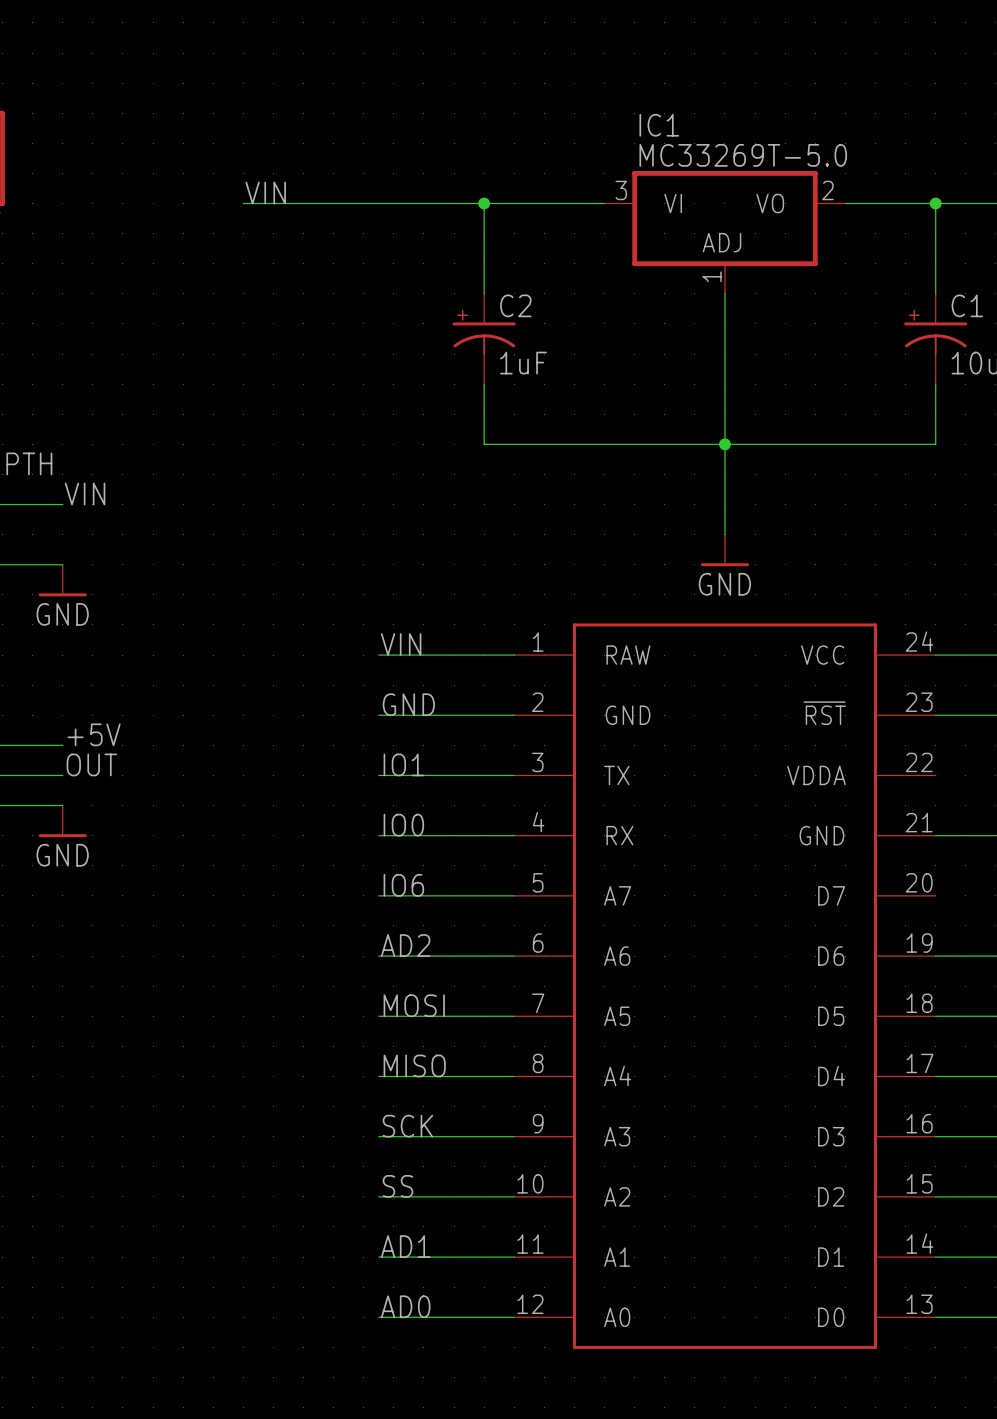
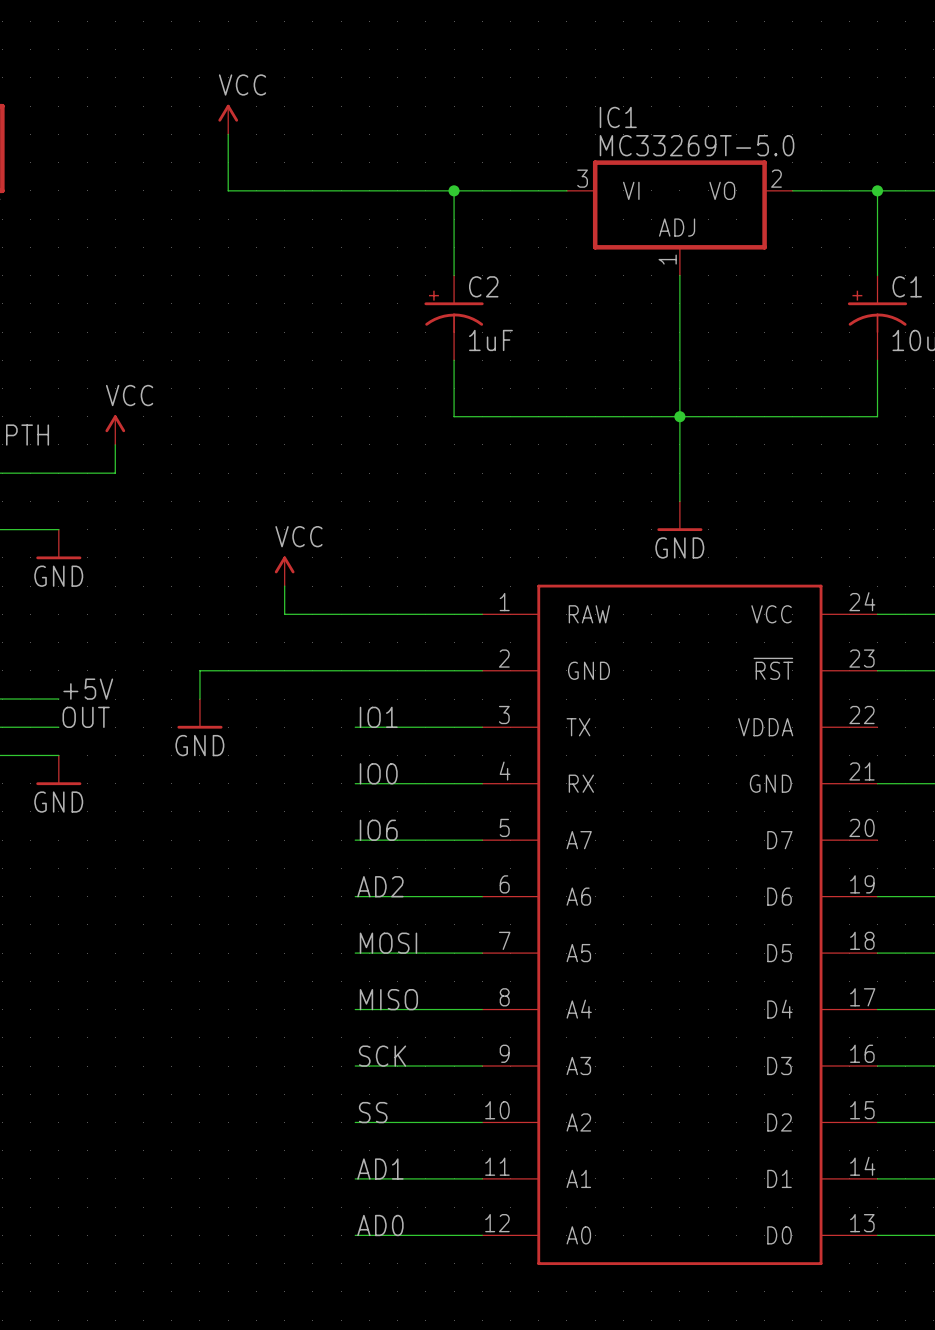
power symbol: none -> VCC (228, 119)
wire: none -> (228, 134) (228, 190)
label: VIN (265, 192) -> none
power symbol: none -> VCC (115, 430)
wire: none -> (115, 444) (115, 473) (58, 473)
label: VIN (85, 494) -> none
power symbol: none -> VCC (284, 571)
wire: none -> (284, 586) (284, 614) (355, 614)
label: VIN (401, 644) -> none
label: GND (408, 704) -> none
wire: none -> (355, 670) (199, 670) (199, 699)
power symbol: none -> GND (199, 713)

